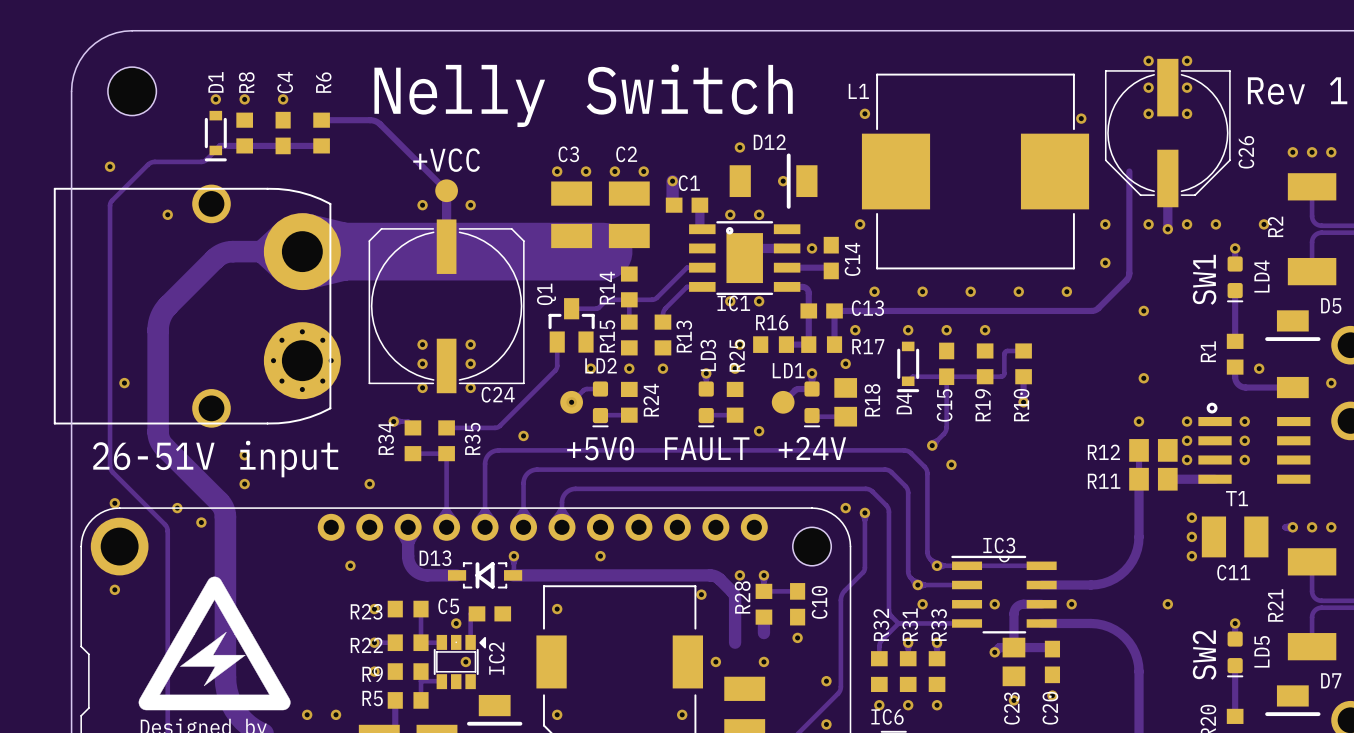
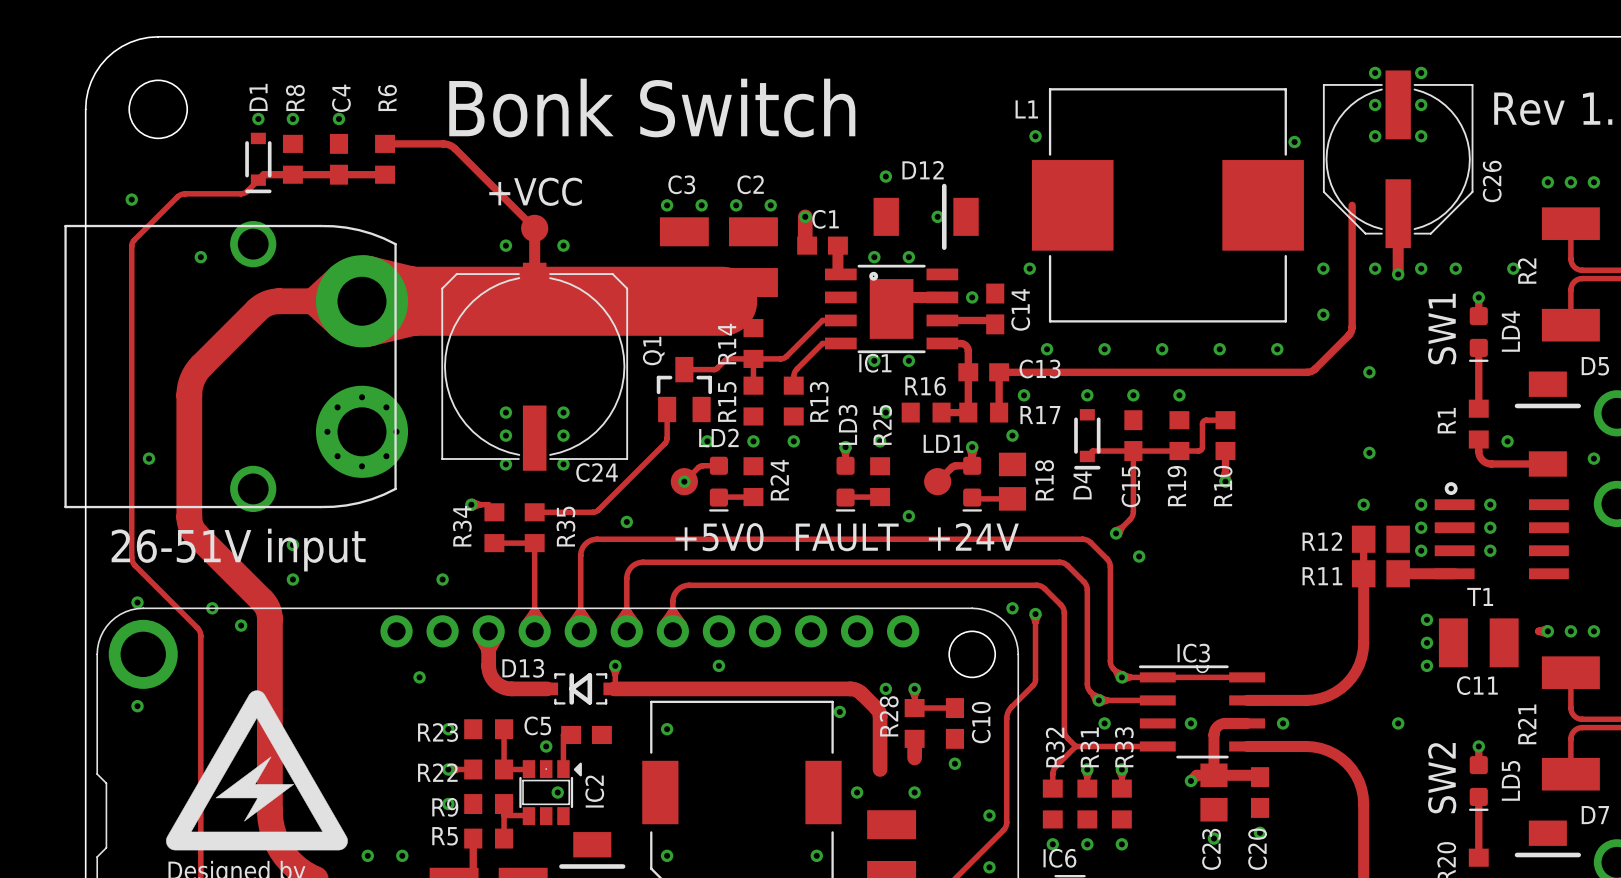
text: Nelly Switch (583, 95) -> Bonk Switch (652, 108)

